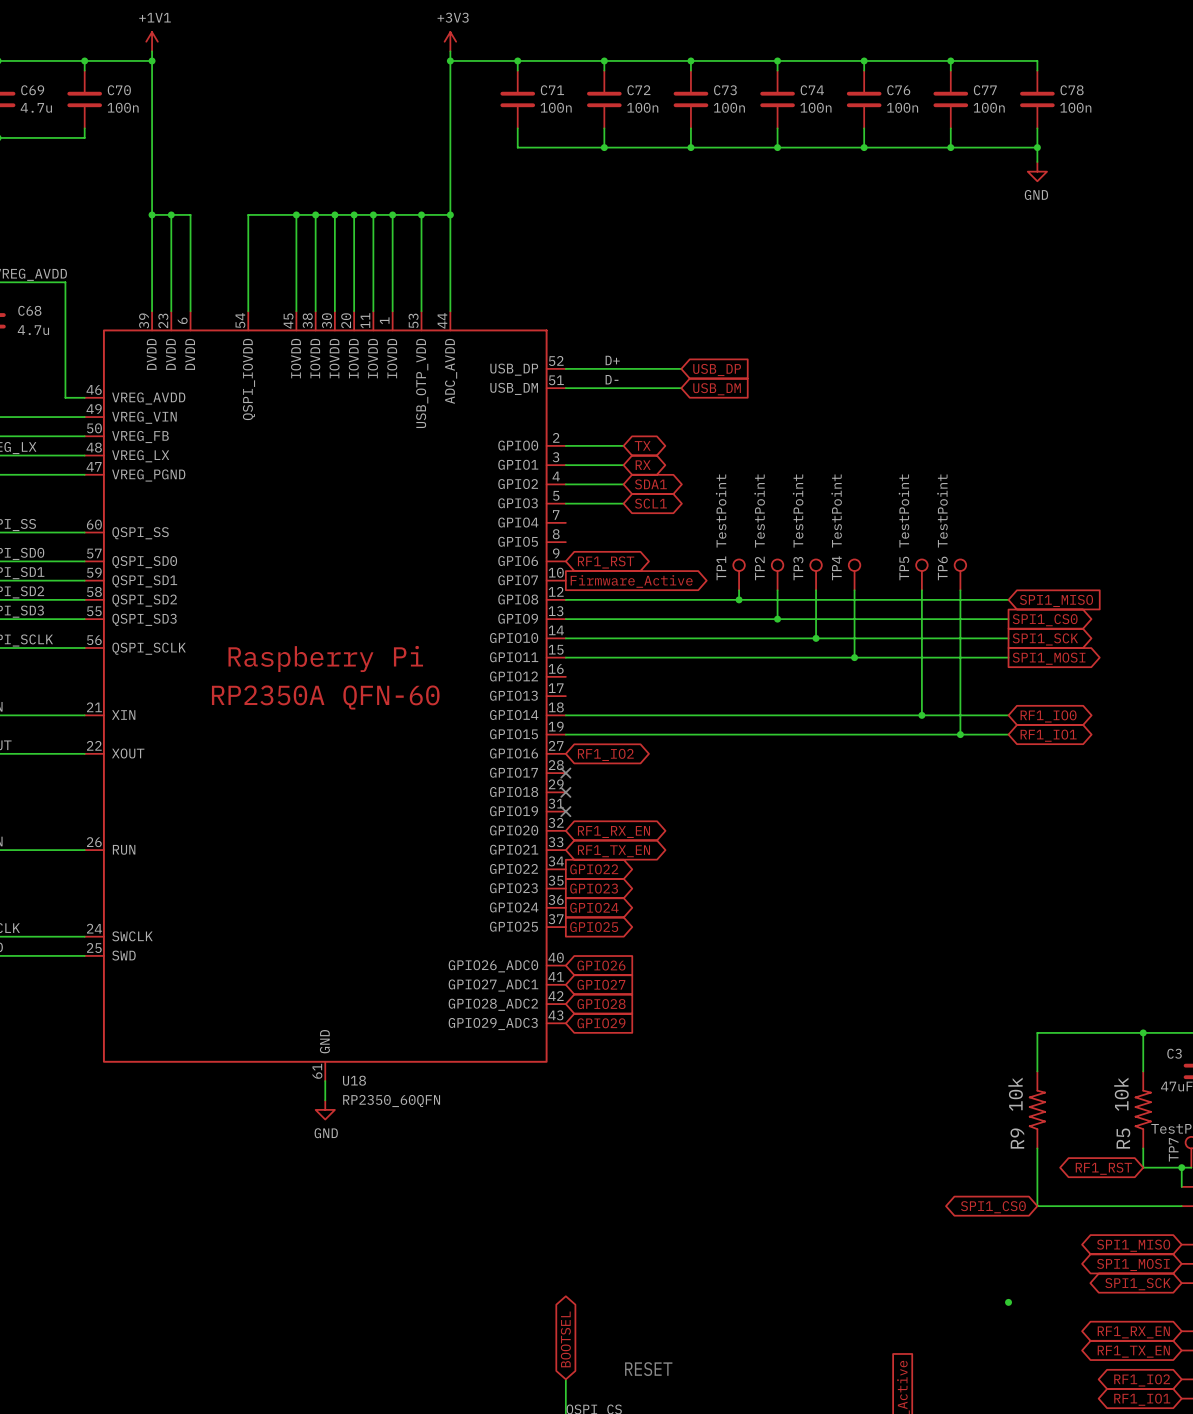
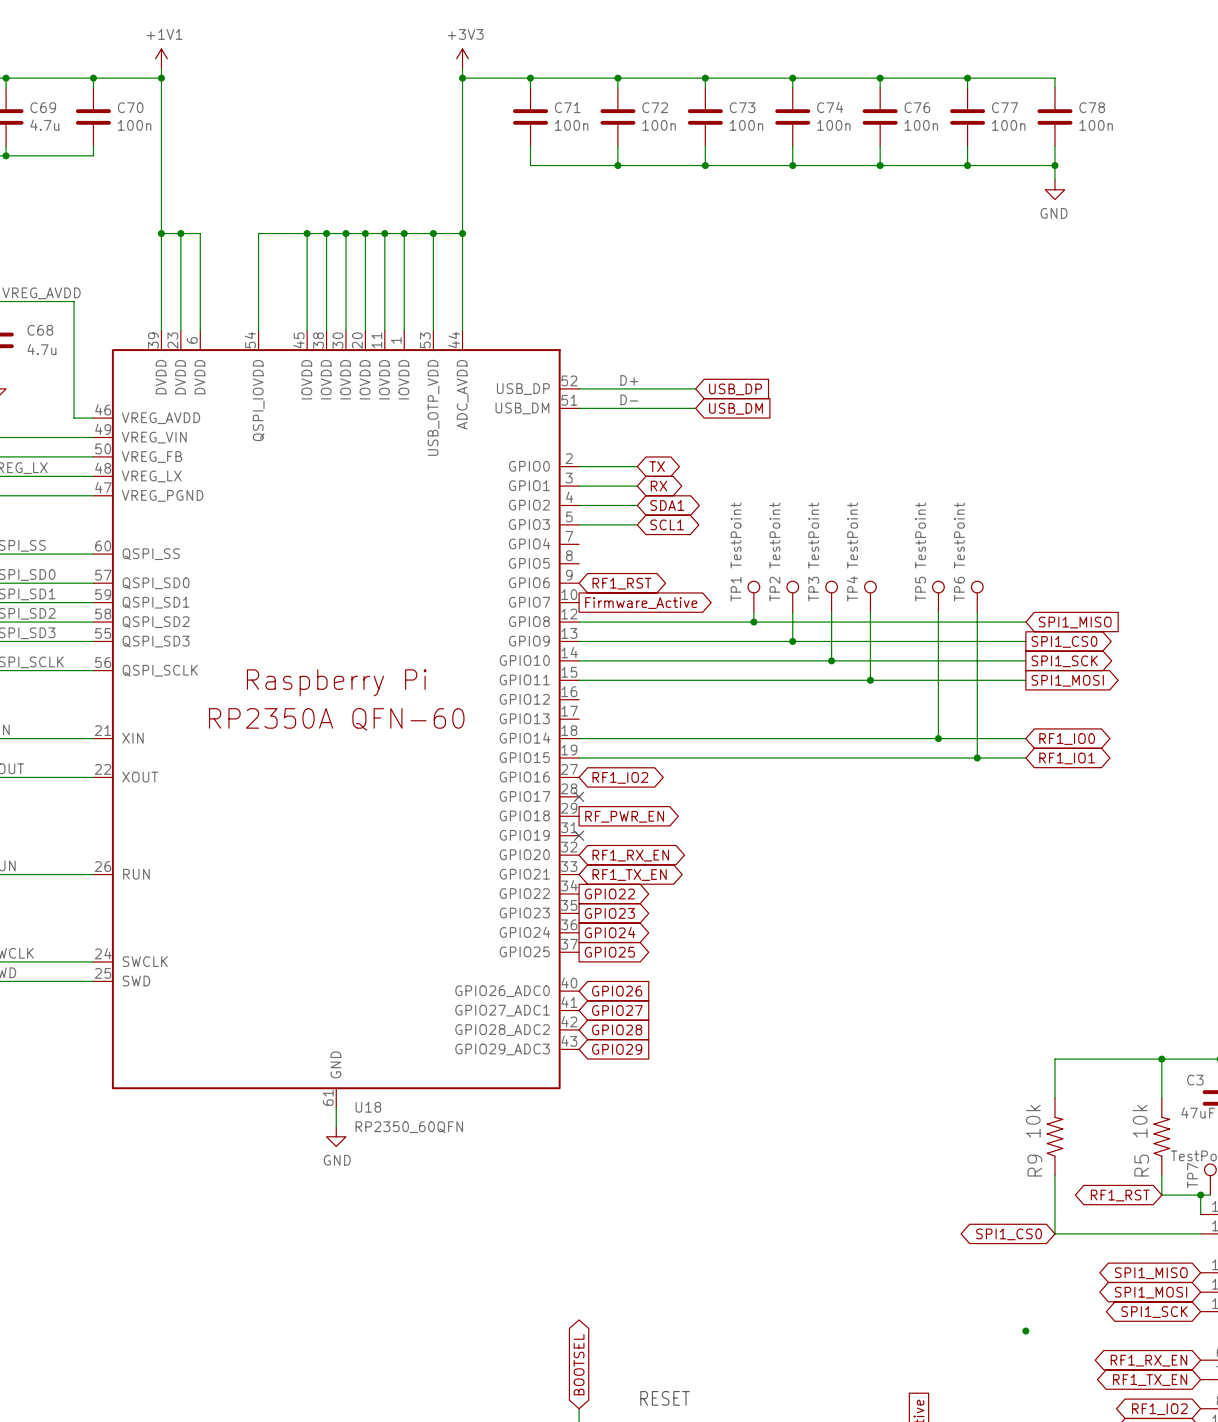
no-connect mark: (565, 792) -> none
global label: none -> RF_PWR_EN (624, 816)

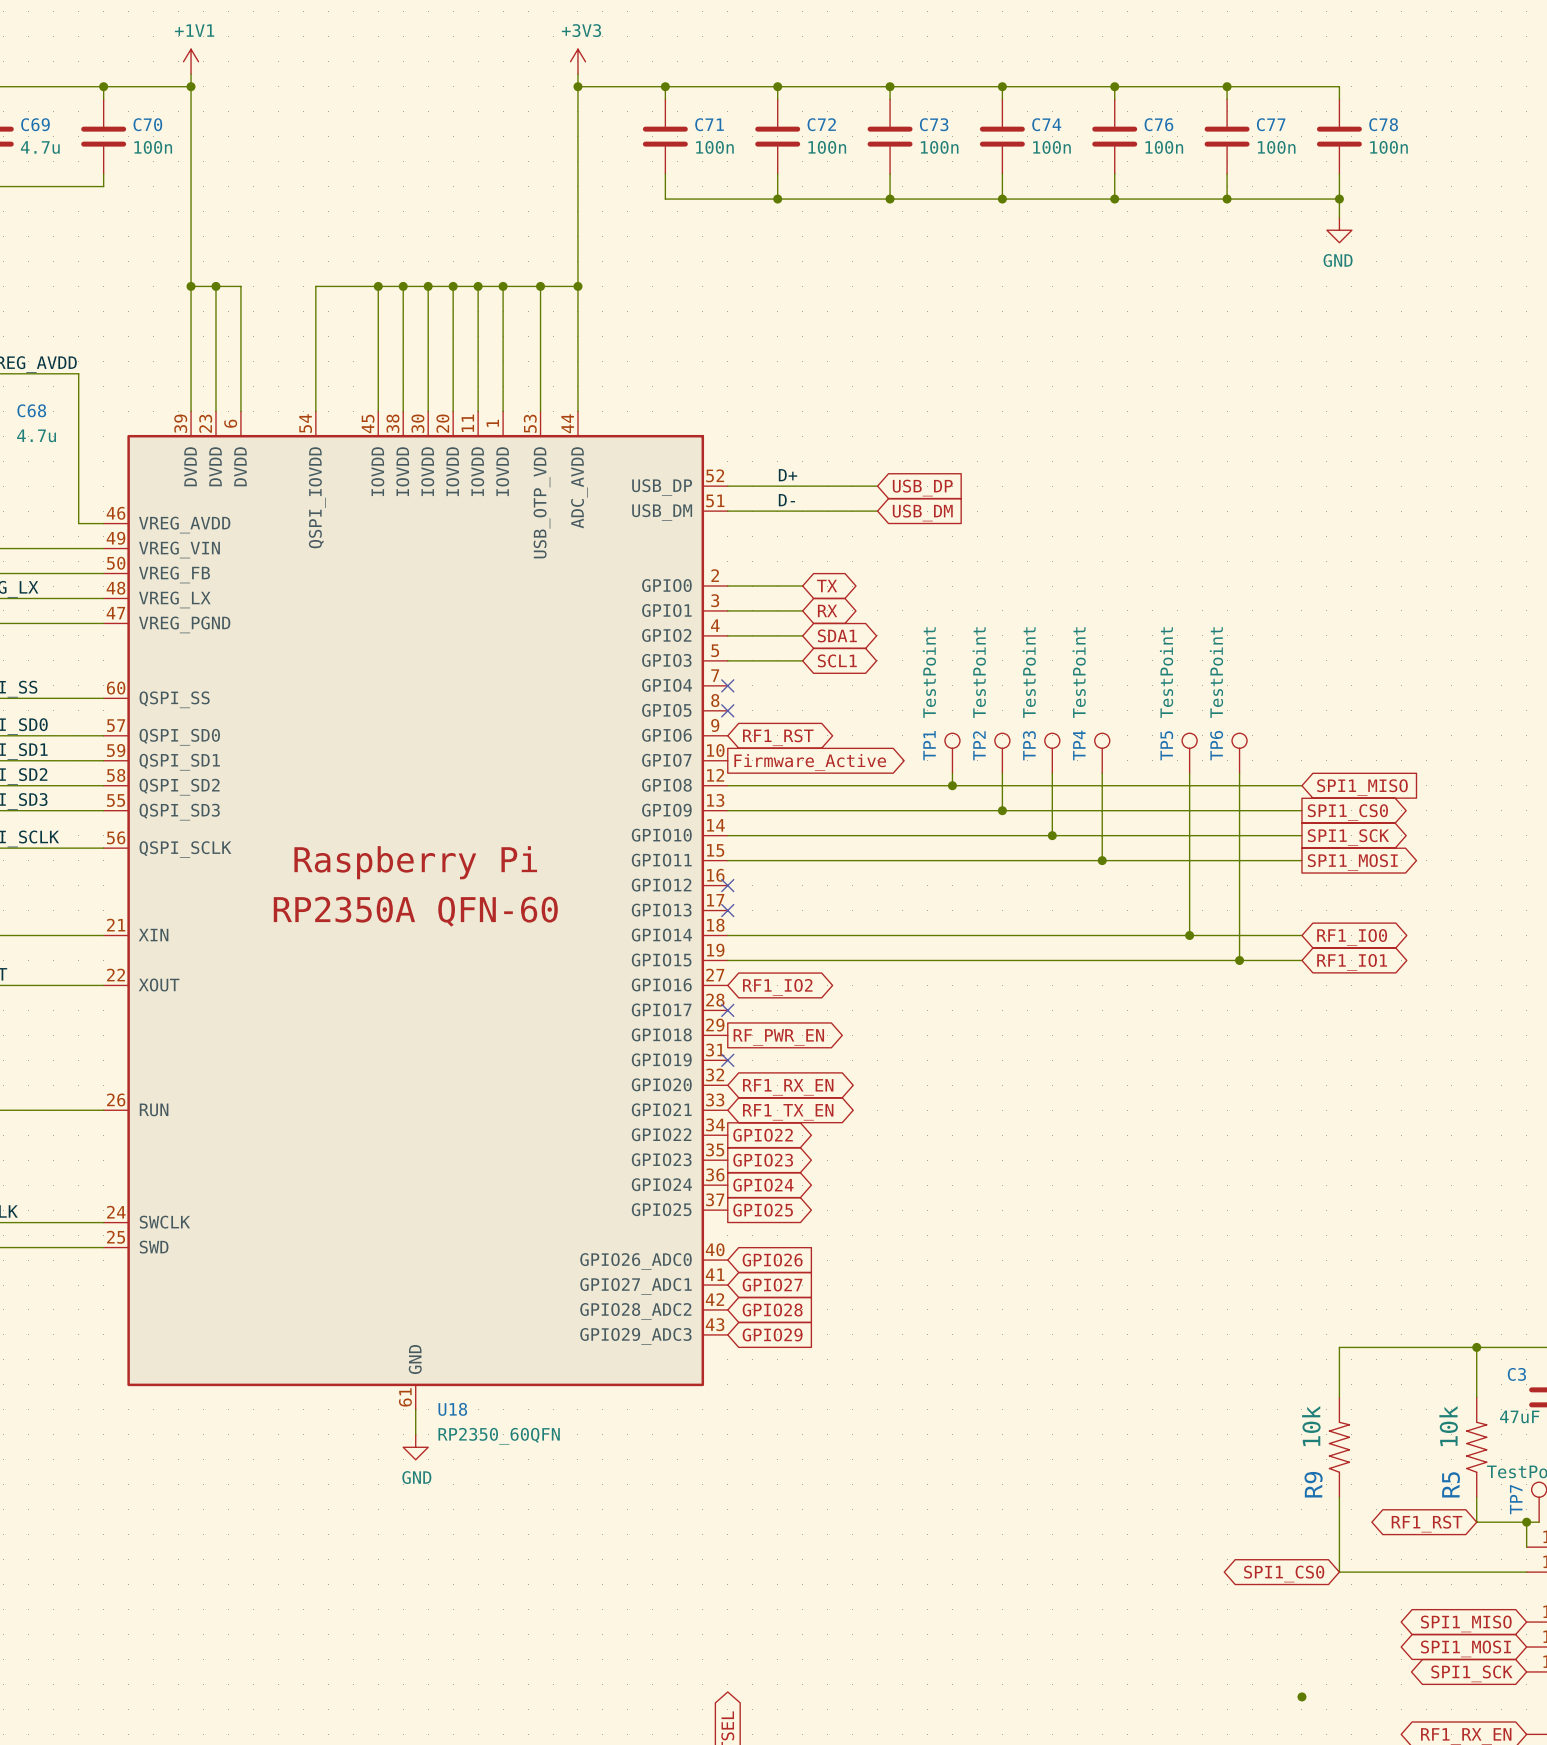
no-connect mark: none -> (727, 685)
no-connect mark: none -> (727, 710)
no-connect mark: none -> (727, 885)
no-connect mark: none -> (727, 910)

